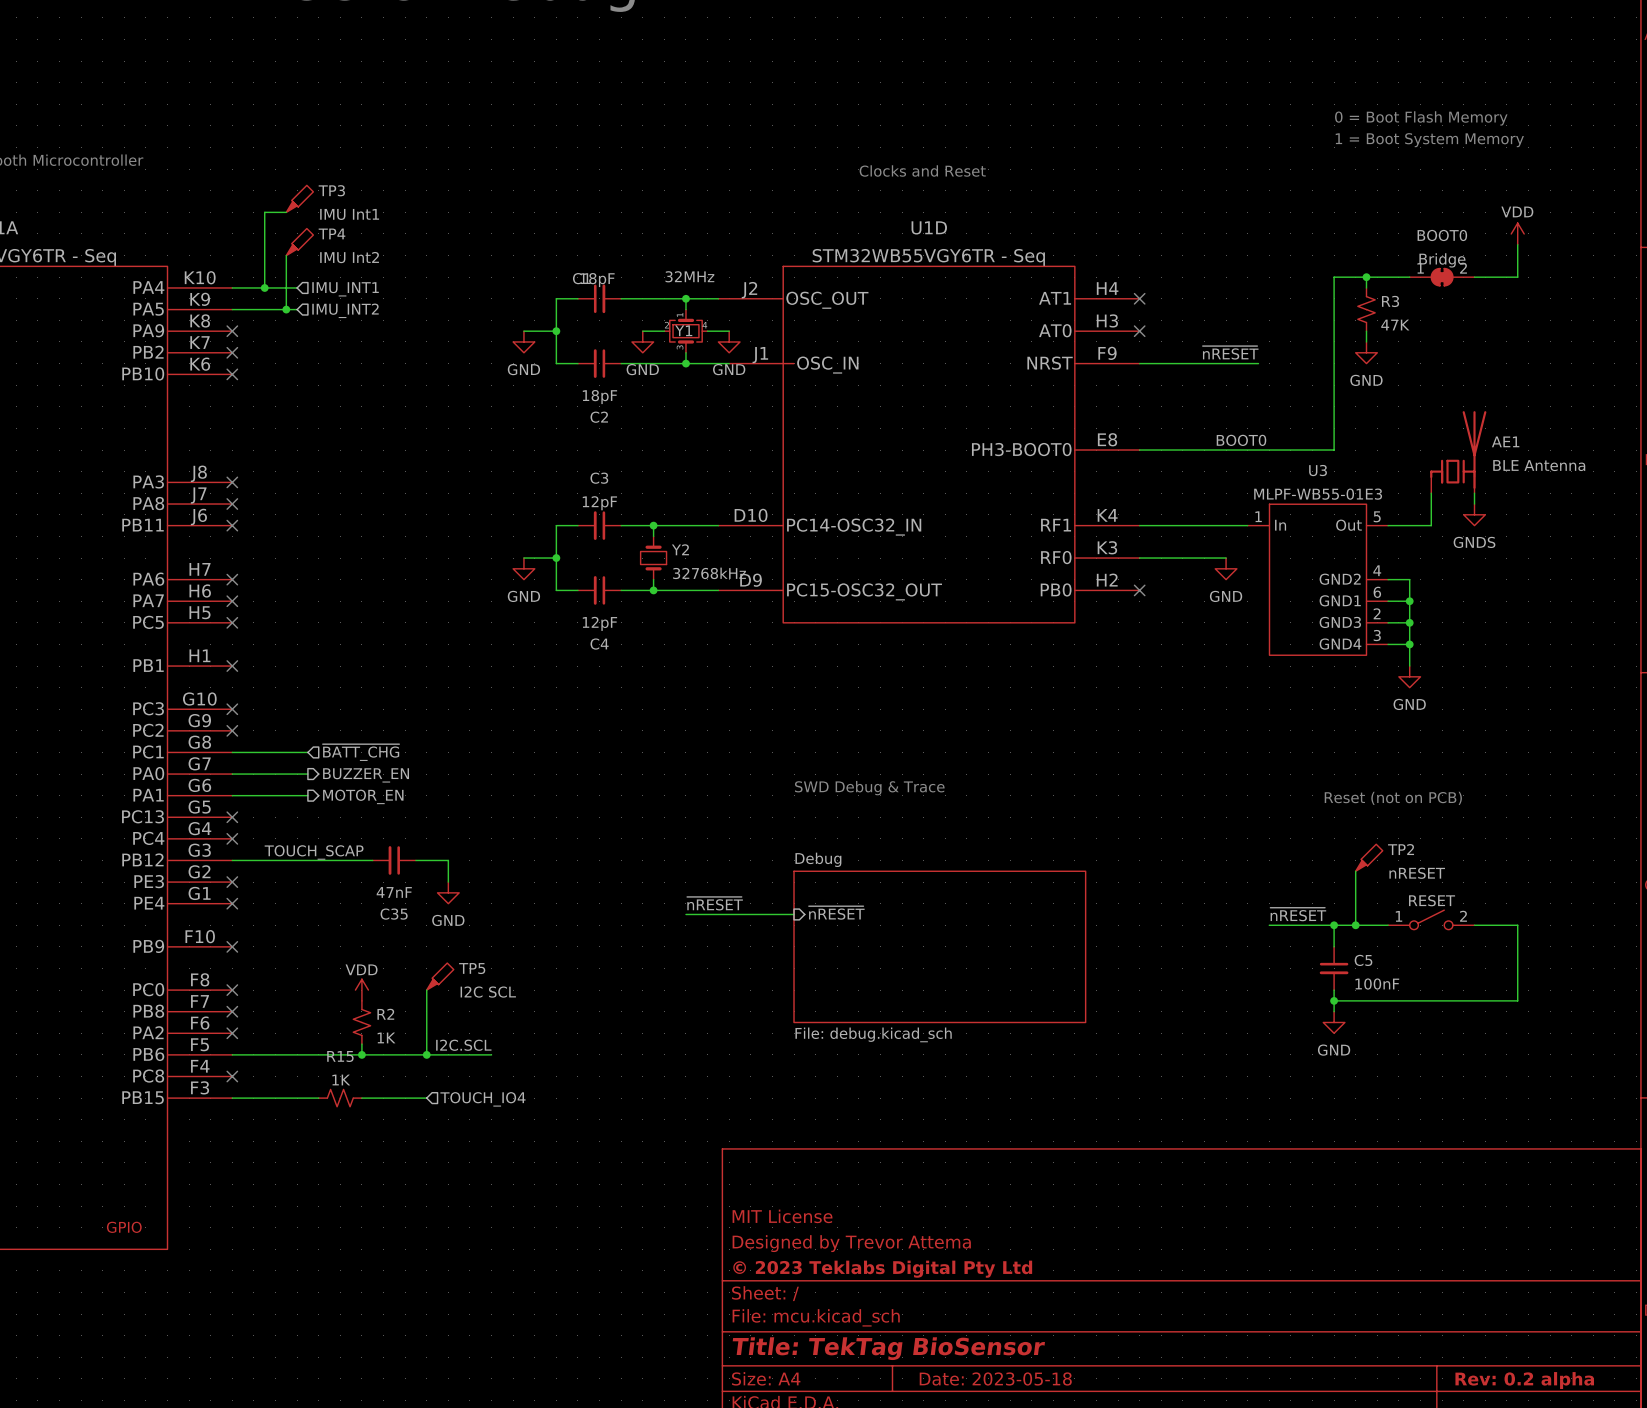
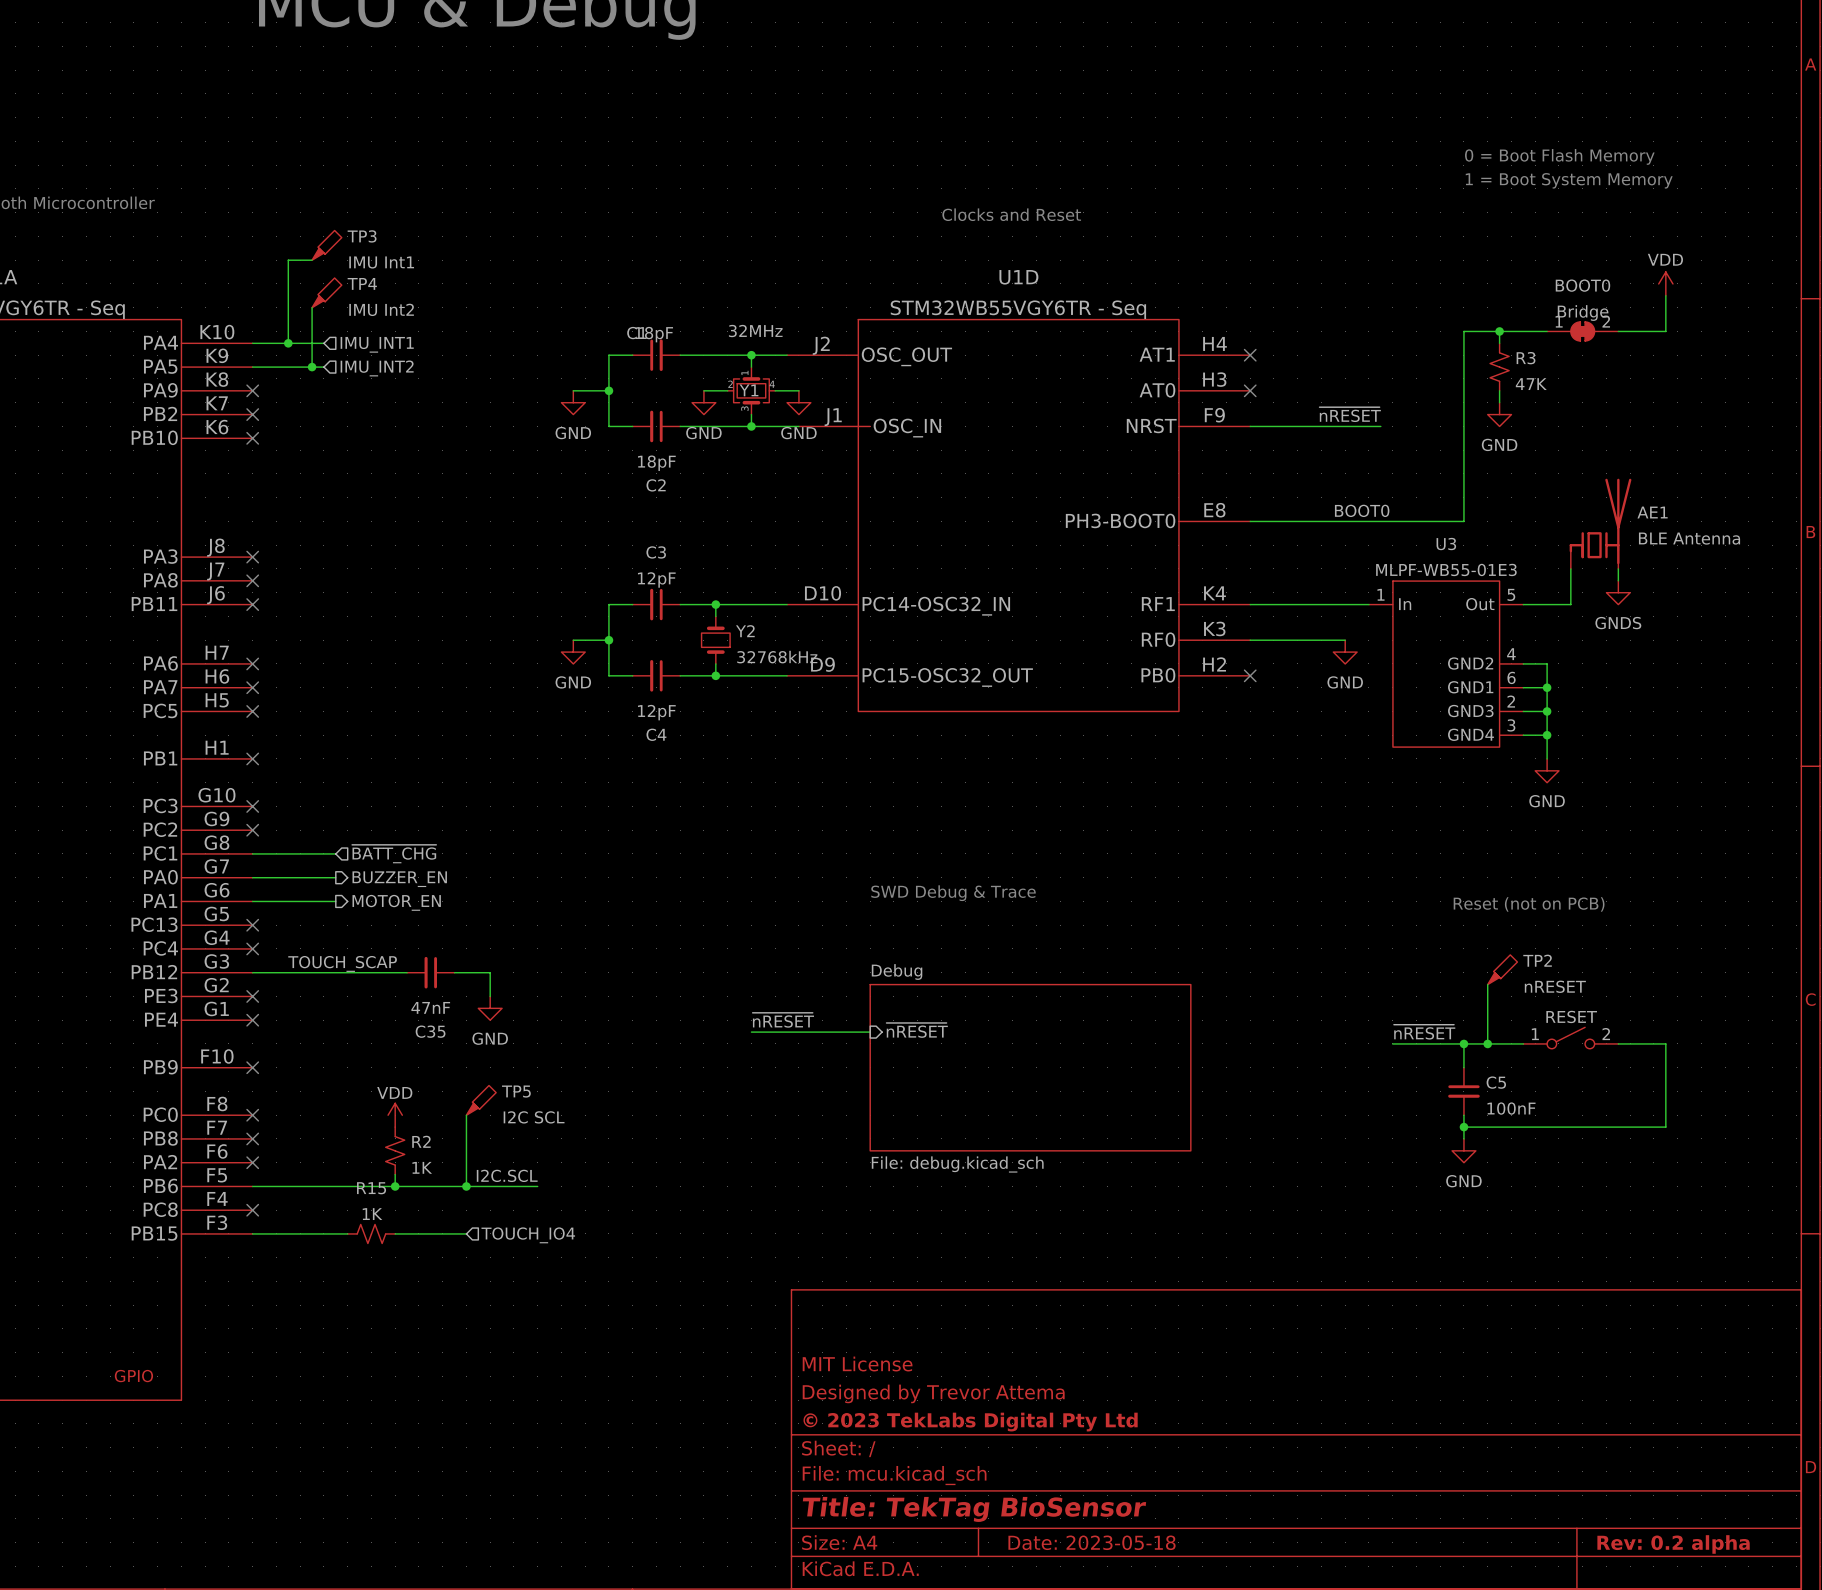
title block: © 2023 Teklabs Digital Pty Ltd (882, 1269) -> © 2023 TekLabs Digital Pty Ltd (970, 1422)

